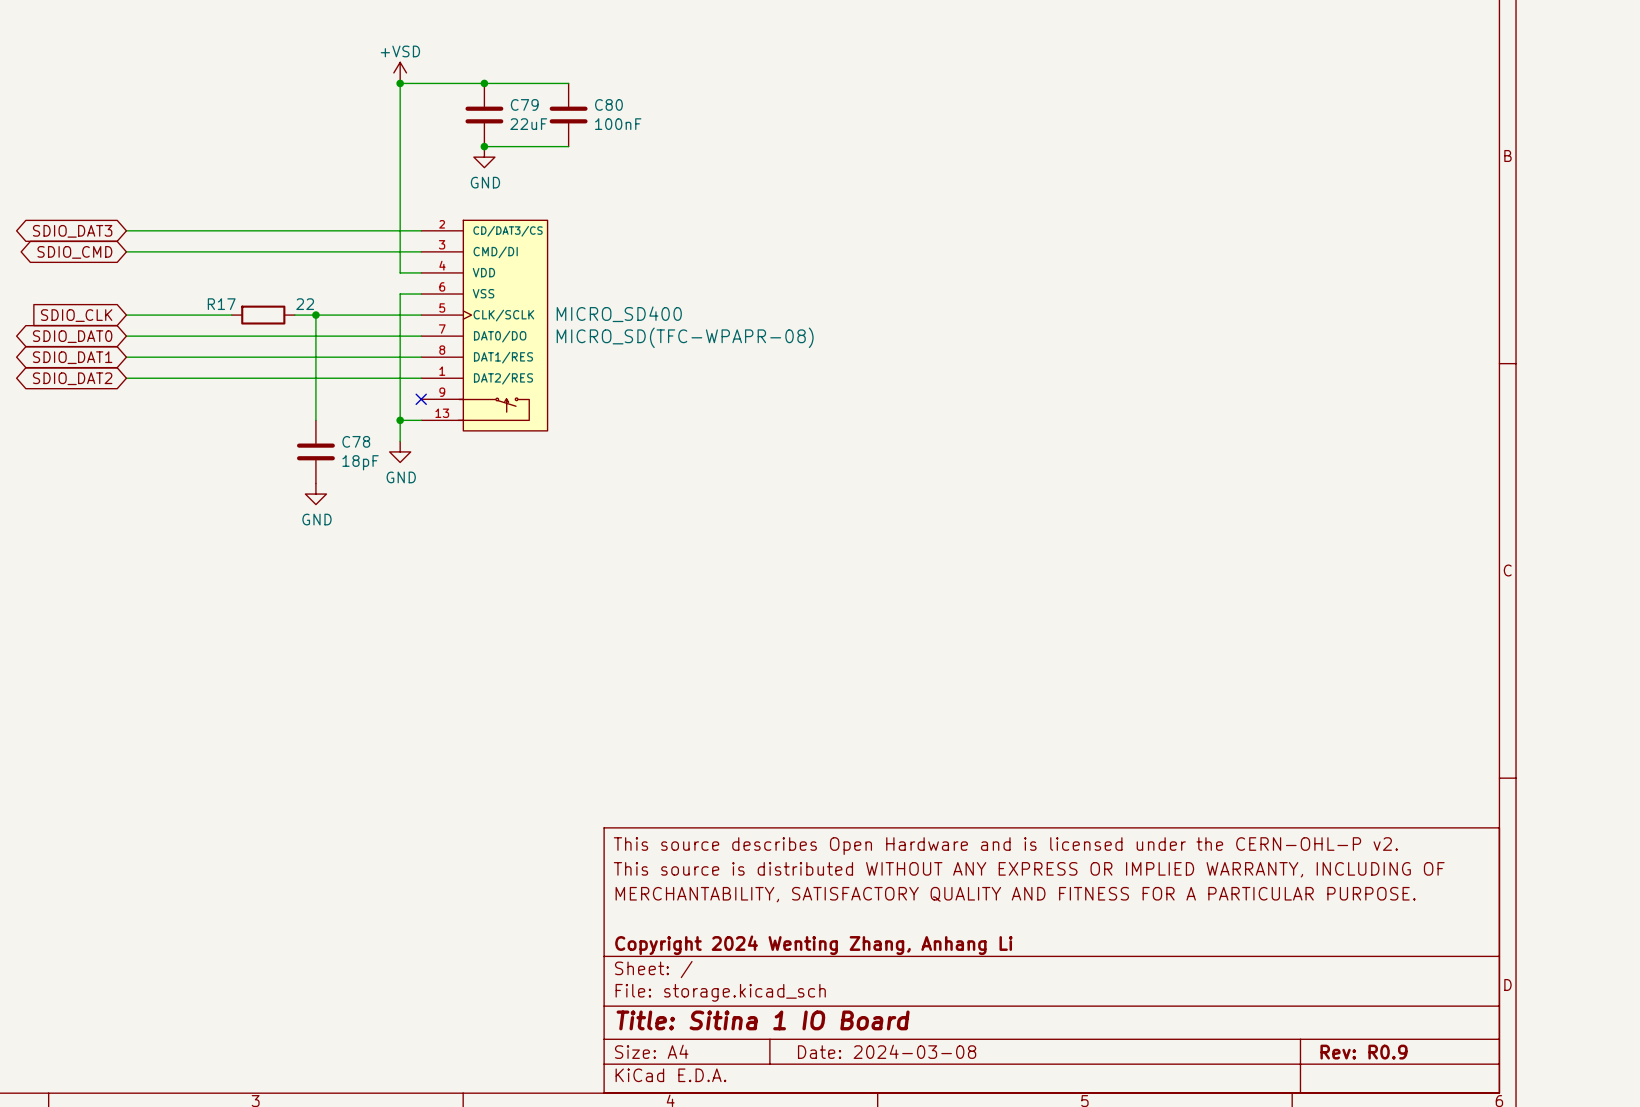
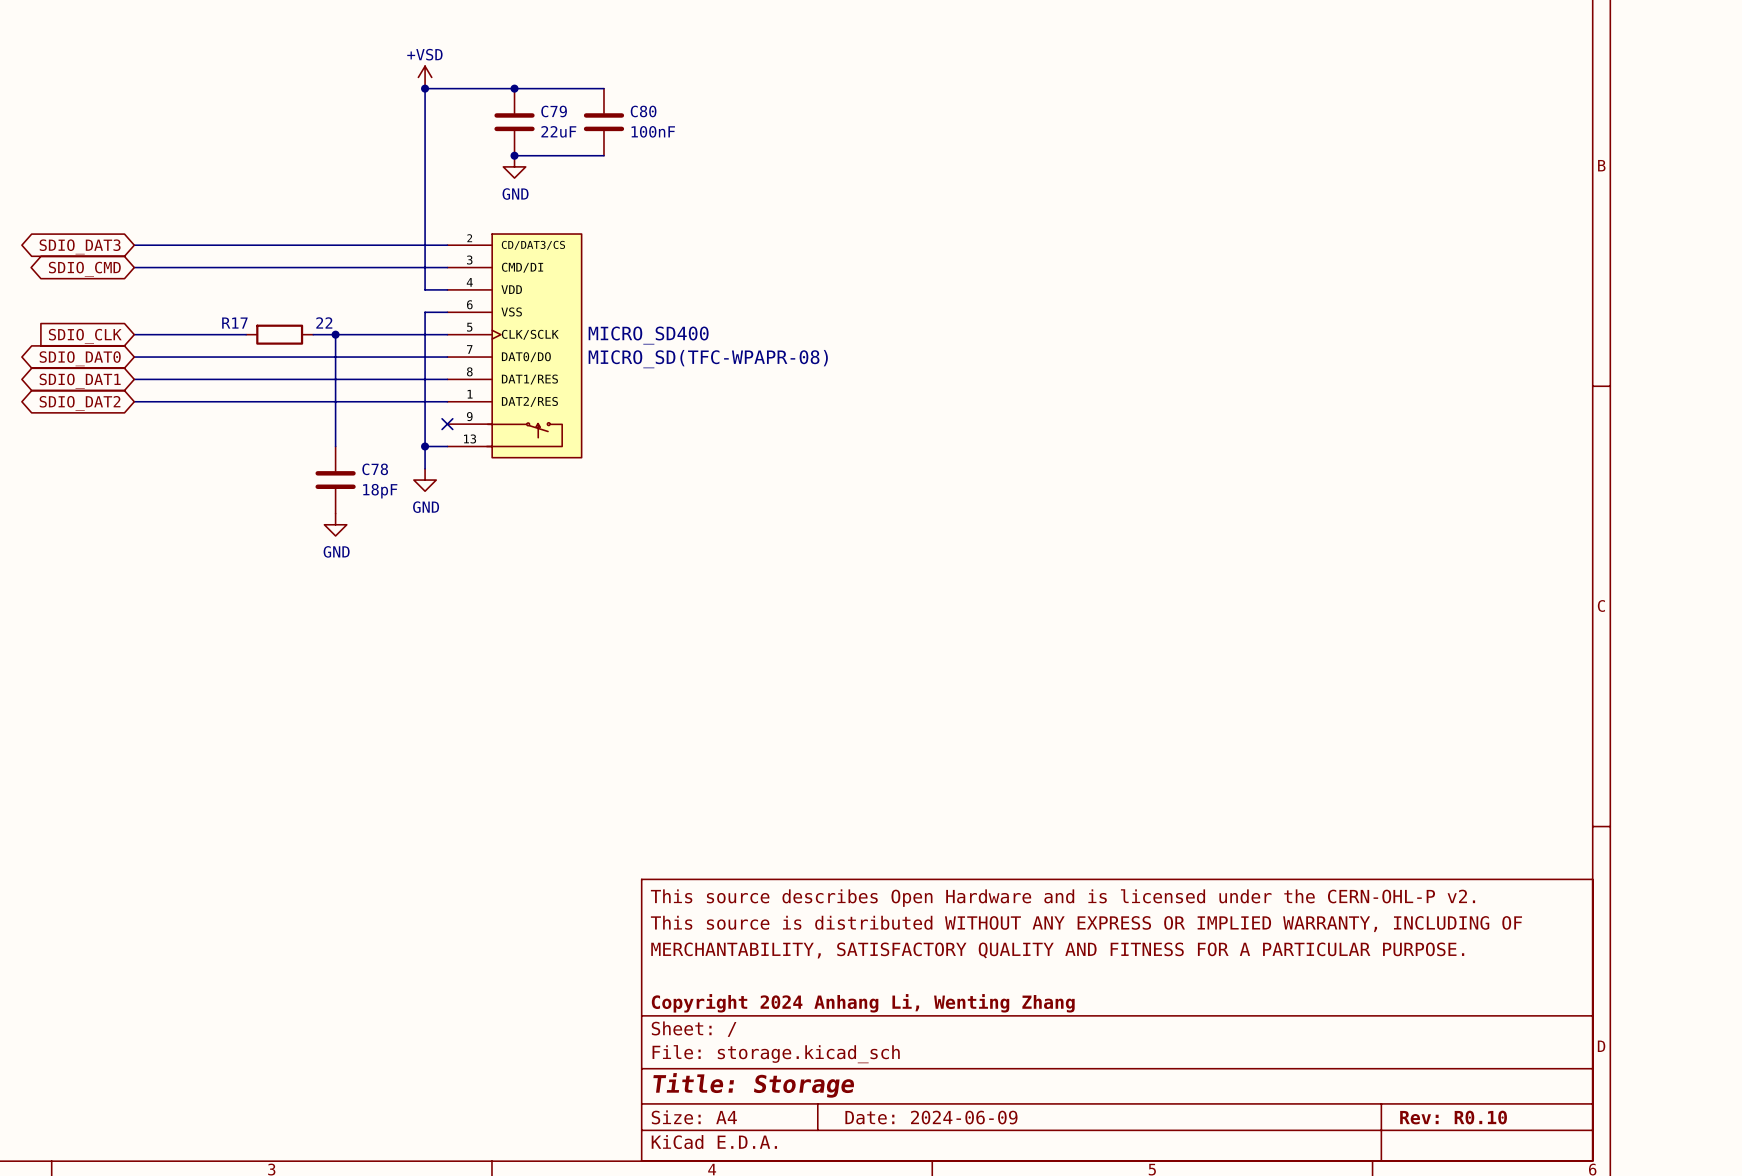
title block: Copyright 2024 Wenting Zhang, Anhang Li (813, 945) -> Copyright 2024 Anhang Li, Wenting Zhang (863, 1003)
title block: Title: Sitina 1 IO Board (763, 1020) -> Title: Storage (753, 1085)
title block: Date: 2024-03-08 (887, 1051) -> Date: 2024-06-09 (931, 1117)
title block: Rev: R0.9 (1363, 1052) -> Rev: R0.10 (1453, 1117)

